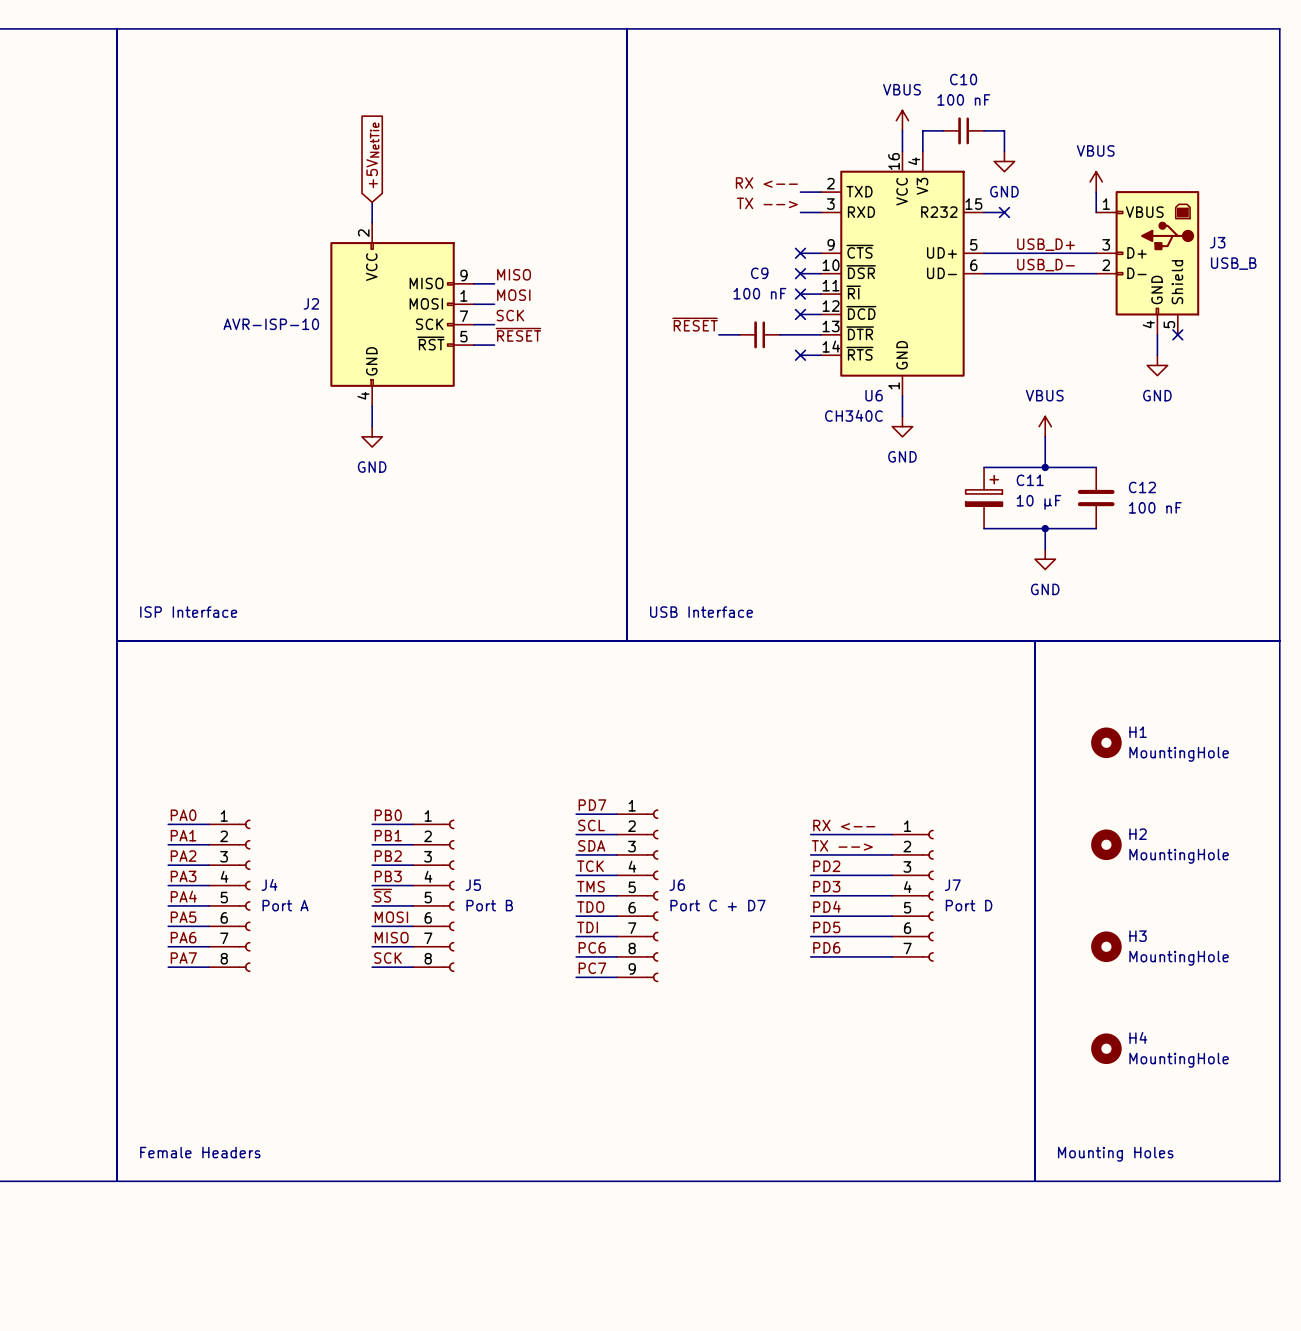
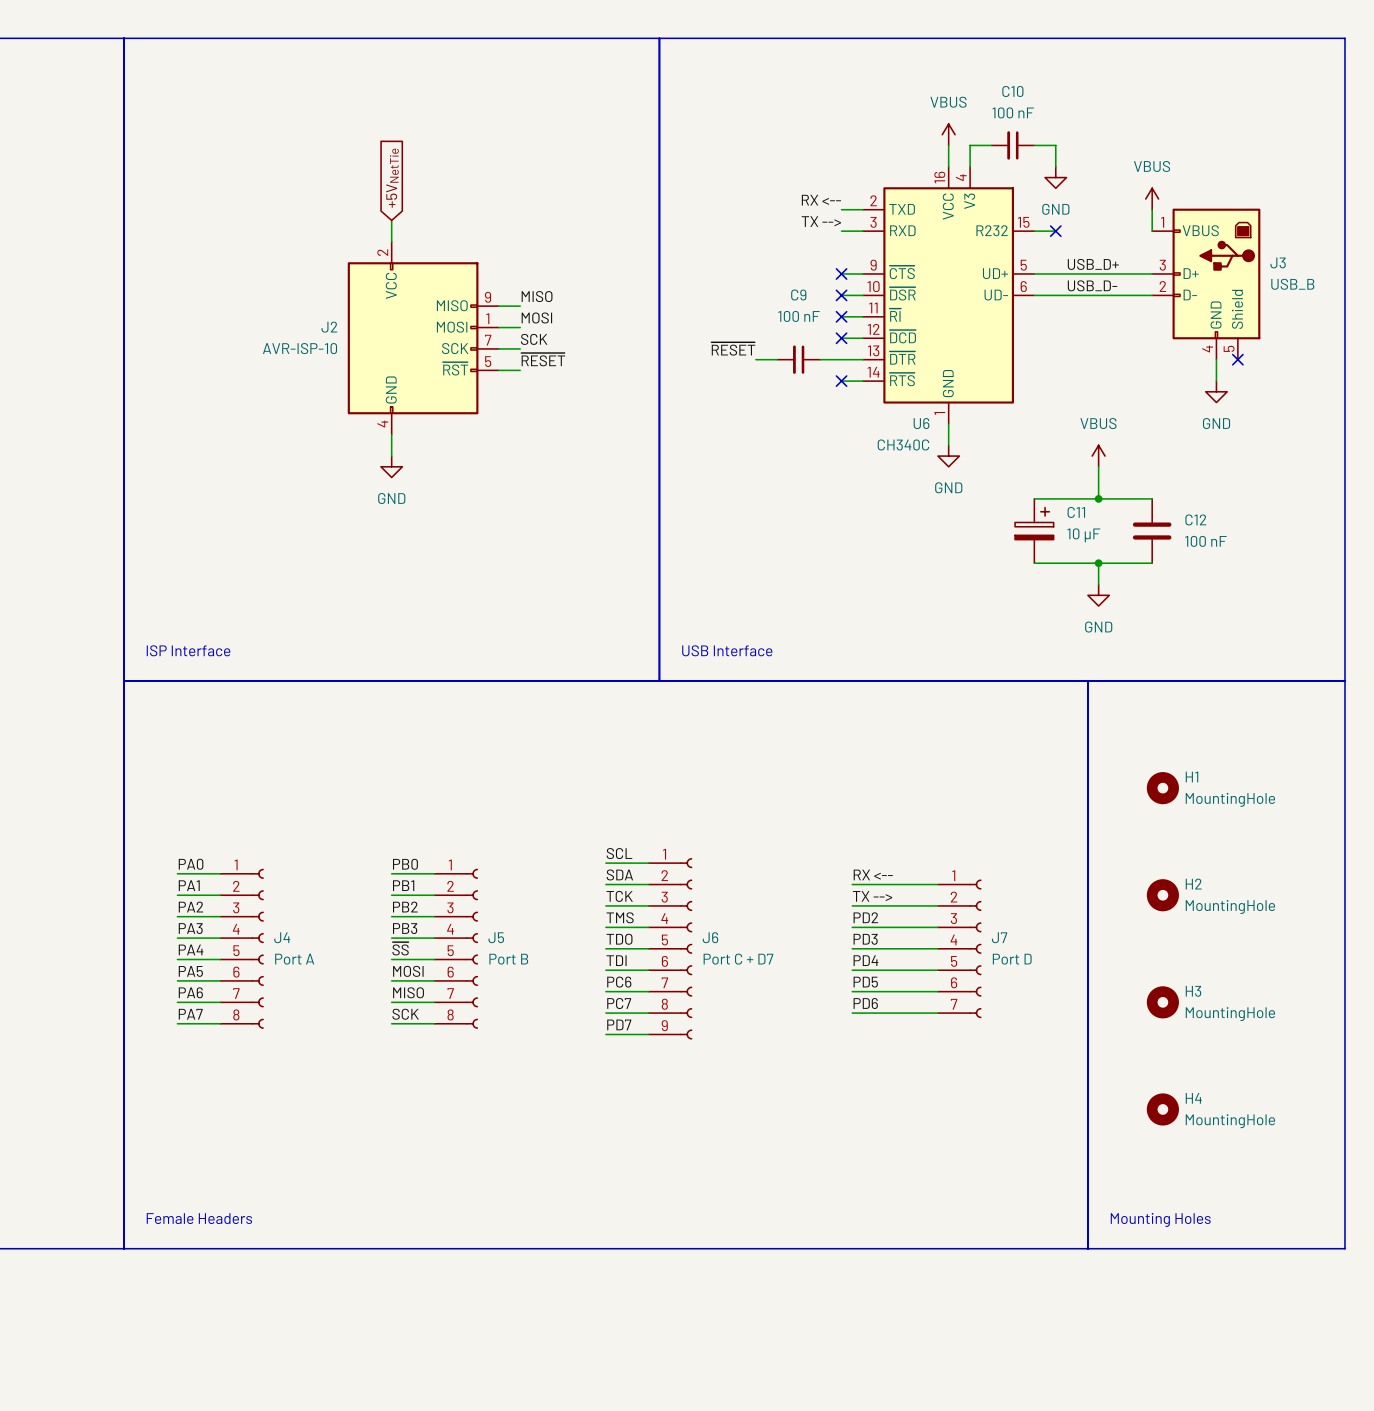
label: PD7 (592, 805) -> SCL (619, 853)
label: SCL (591, 825) -> SDA (619, 874)
label: SDA (591, 845) -> TCK (619, 896)
label: TCK (590, 866) -> TMS (620, 917)
label: TMS (591, 886) -> TDO (619, 939)
label: TDO (590, 907) -> TDI (616, 960)
label: TDI (587, 927) -> PC6 (619, 982)
label: PC6 (592, 947) -> PC7 (619, 1003)
label: PC7 (592, 968) -> PD7 (619, 1024)

